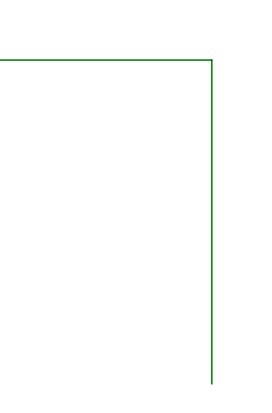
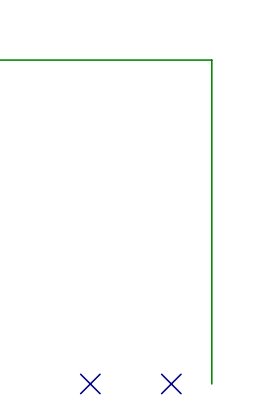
no-connect mark: none -> (90, 383)
no-connect mark: none -> (171, 383)

